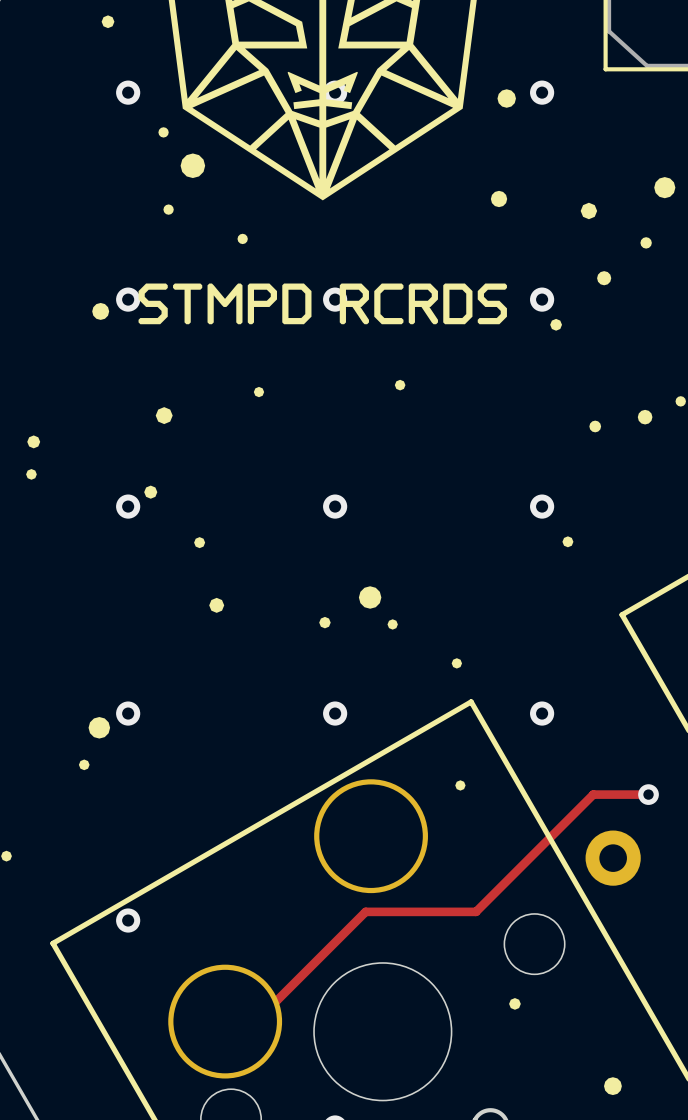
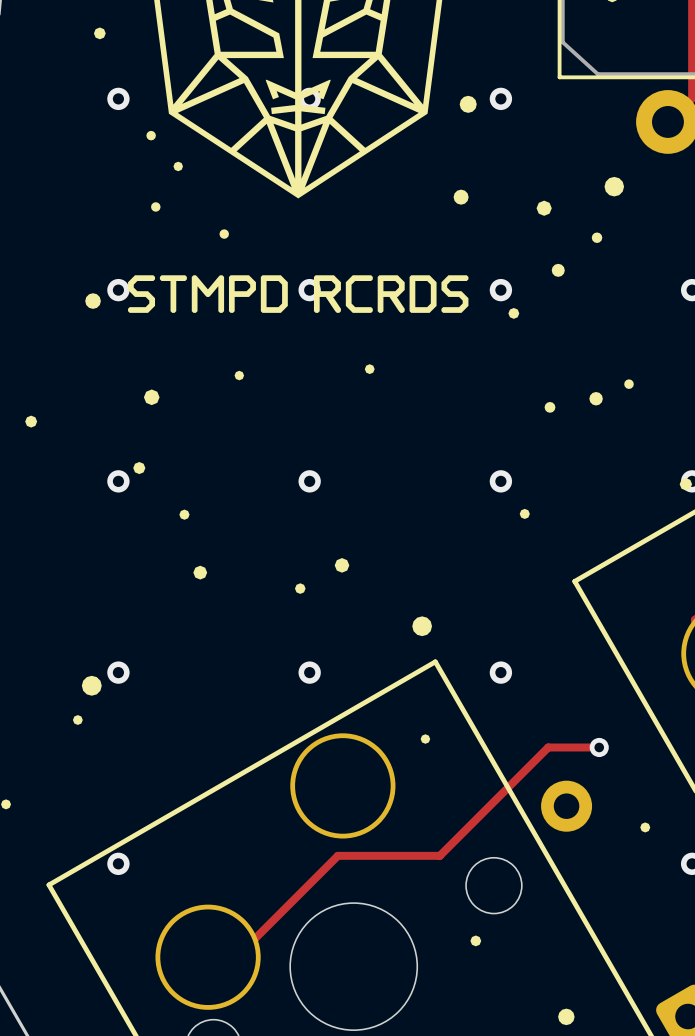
drawing shape: [180, 153, 206, 179] -> [173, 161, 184, 172]
drawing: [26, 469, 37, 480] -> none
drawing: none -> [334, 558, 350, 573]
drawing position: (370, 597) -> (422, 626)
drawing: [387, 619, 398, 630] -> none
drawing: [451, 658, 463, 669] -> none

